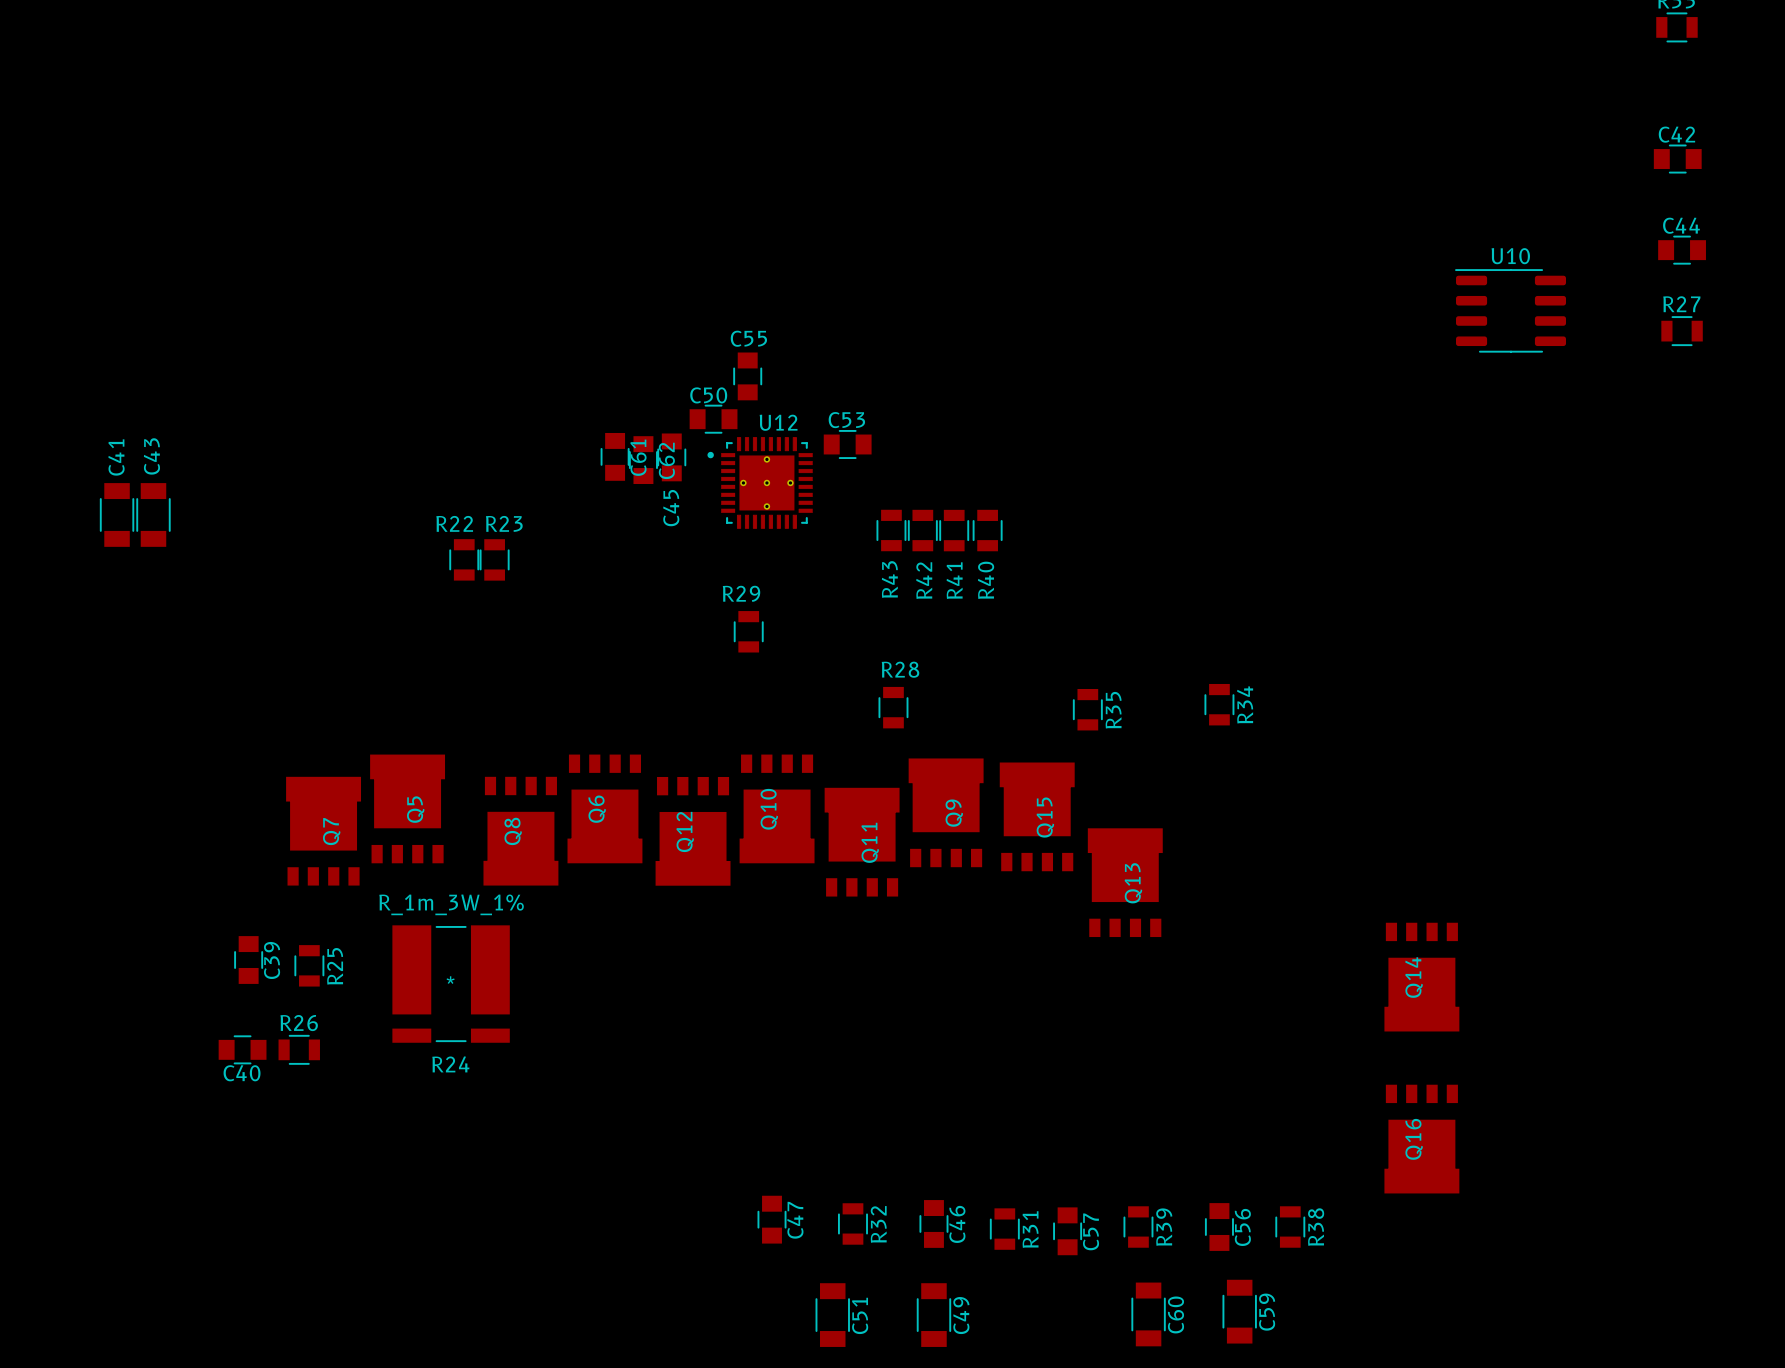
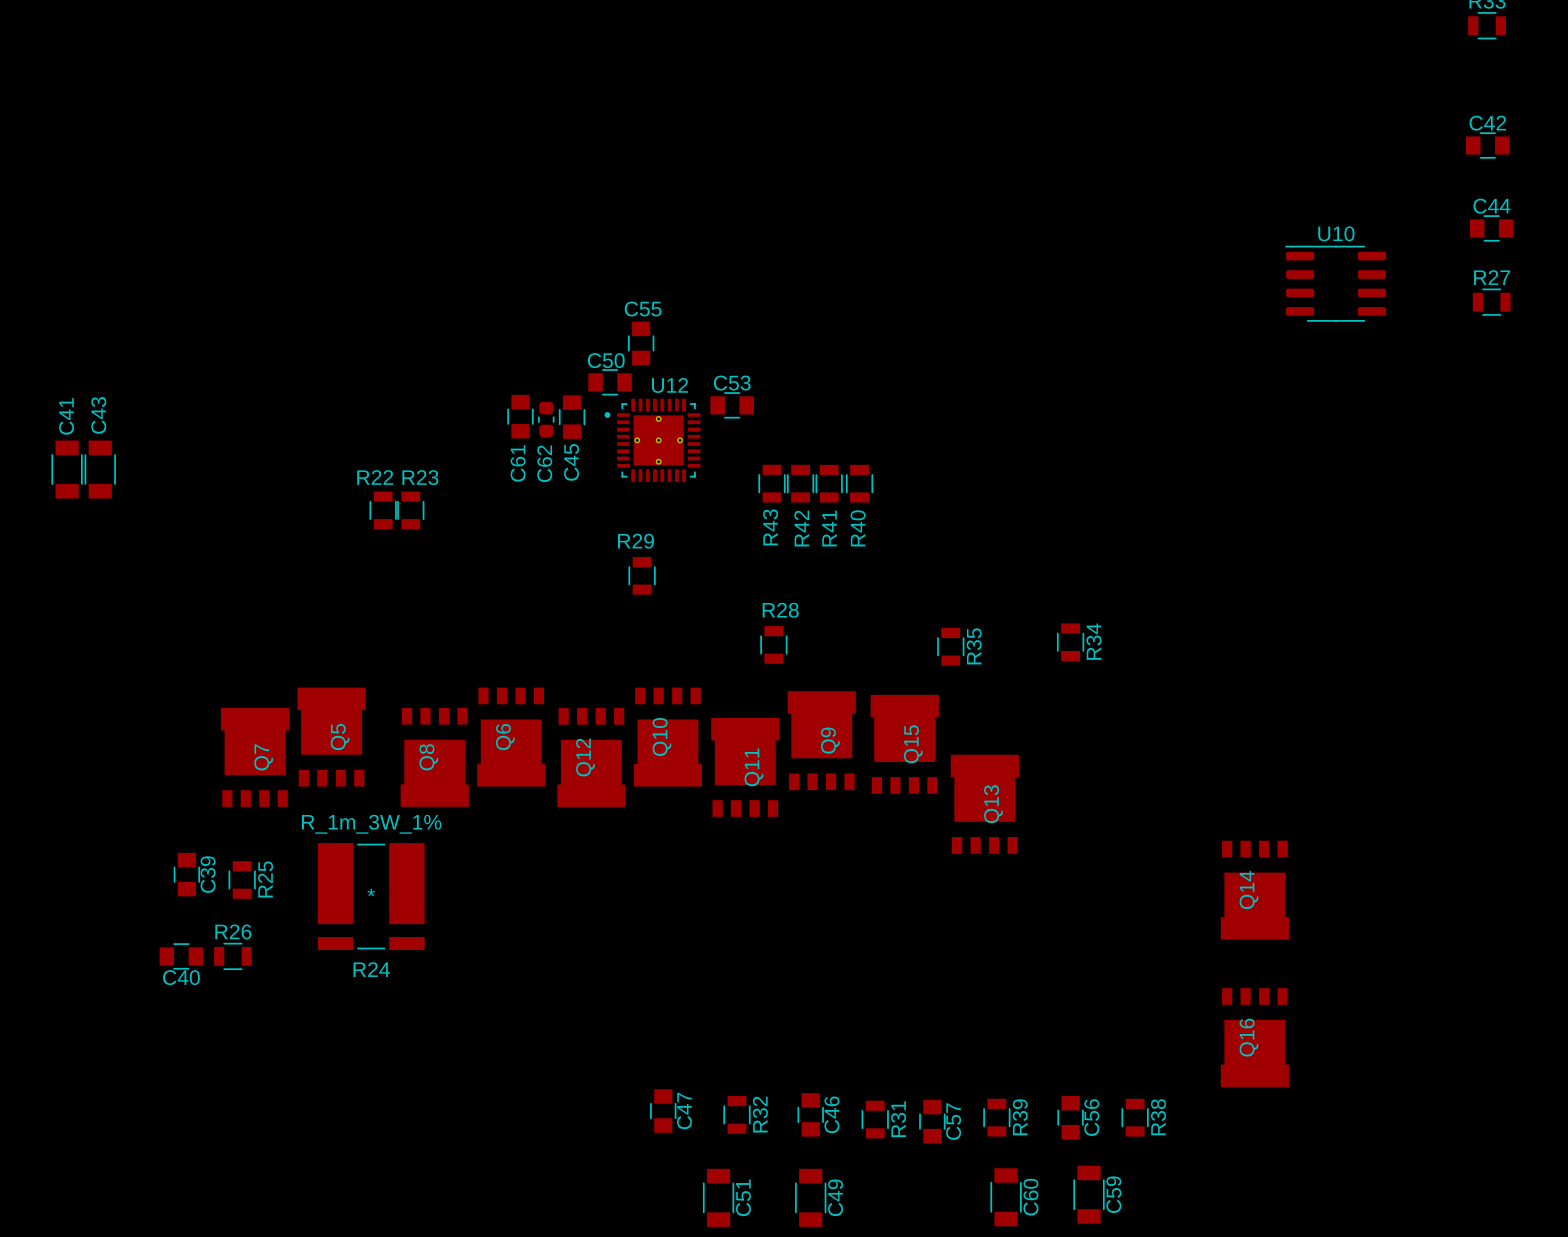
C62 footprint: [628, 436, 658, 485] -> [537, 401, 555, 438]
C61 name position: C61 (638, 457) -> C61 (518, 463)
C62 name position: C62 (666, 460) -> C62 (544, 463)

